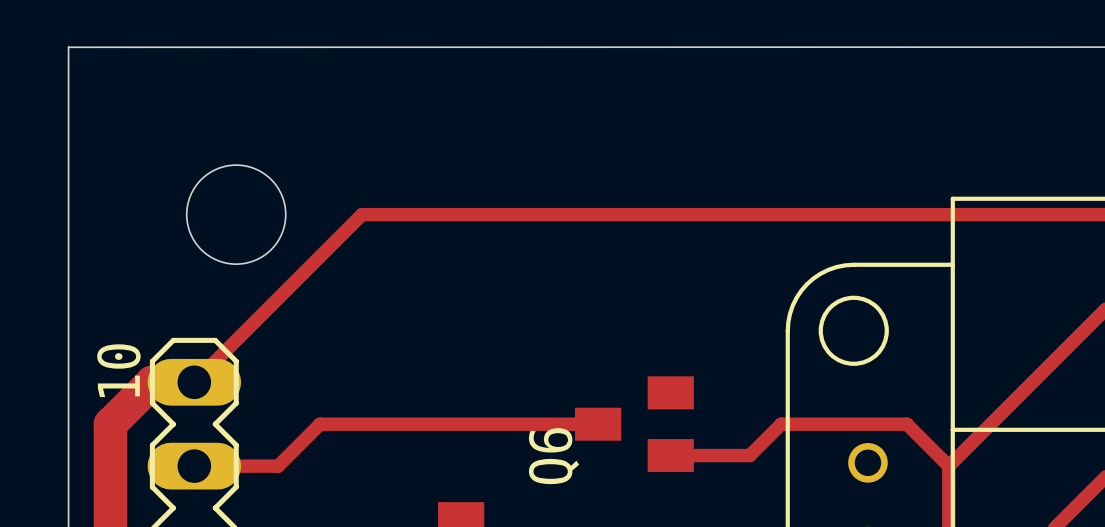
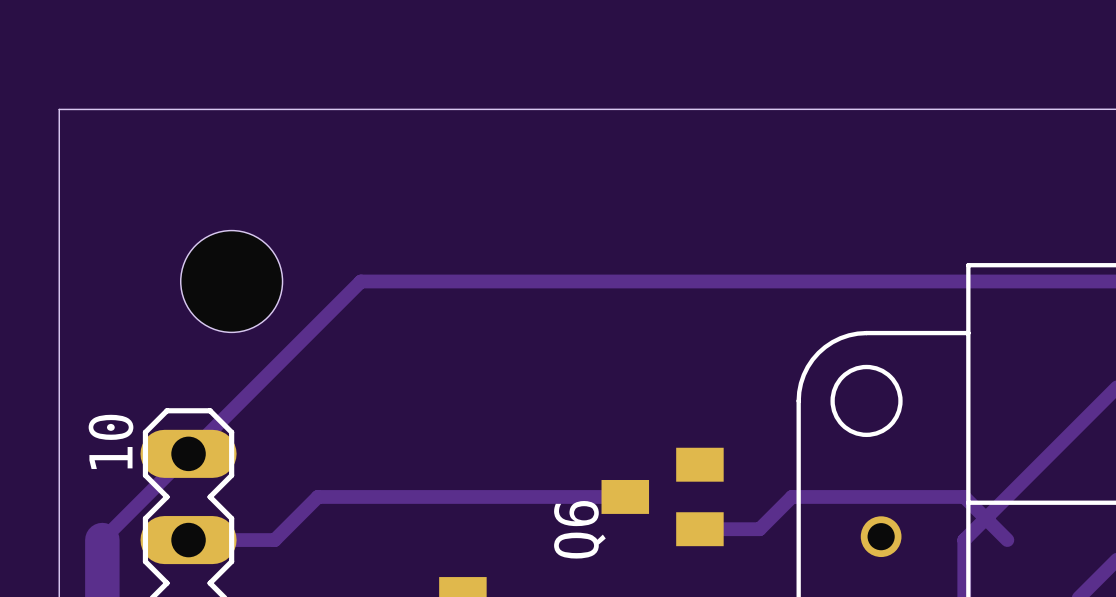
track: (194, 382) (152, 382) (110, 424) (110, 466) -> (188, 453) (102, 540)
Q6 position: (634, 424) -> (662, 496)
track: (906, 424) (948, 466) -> (921, 496) (964, 496) (1007, 540)

